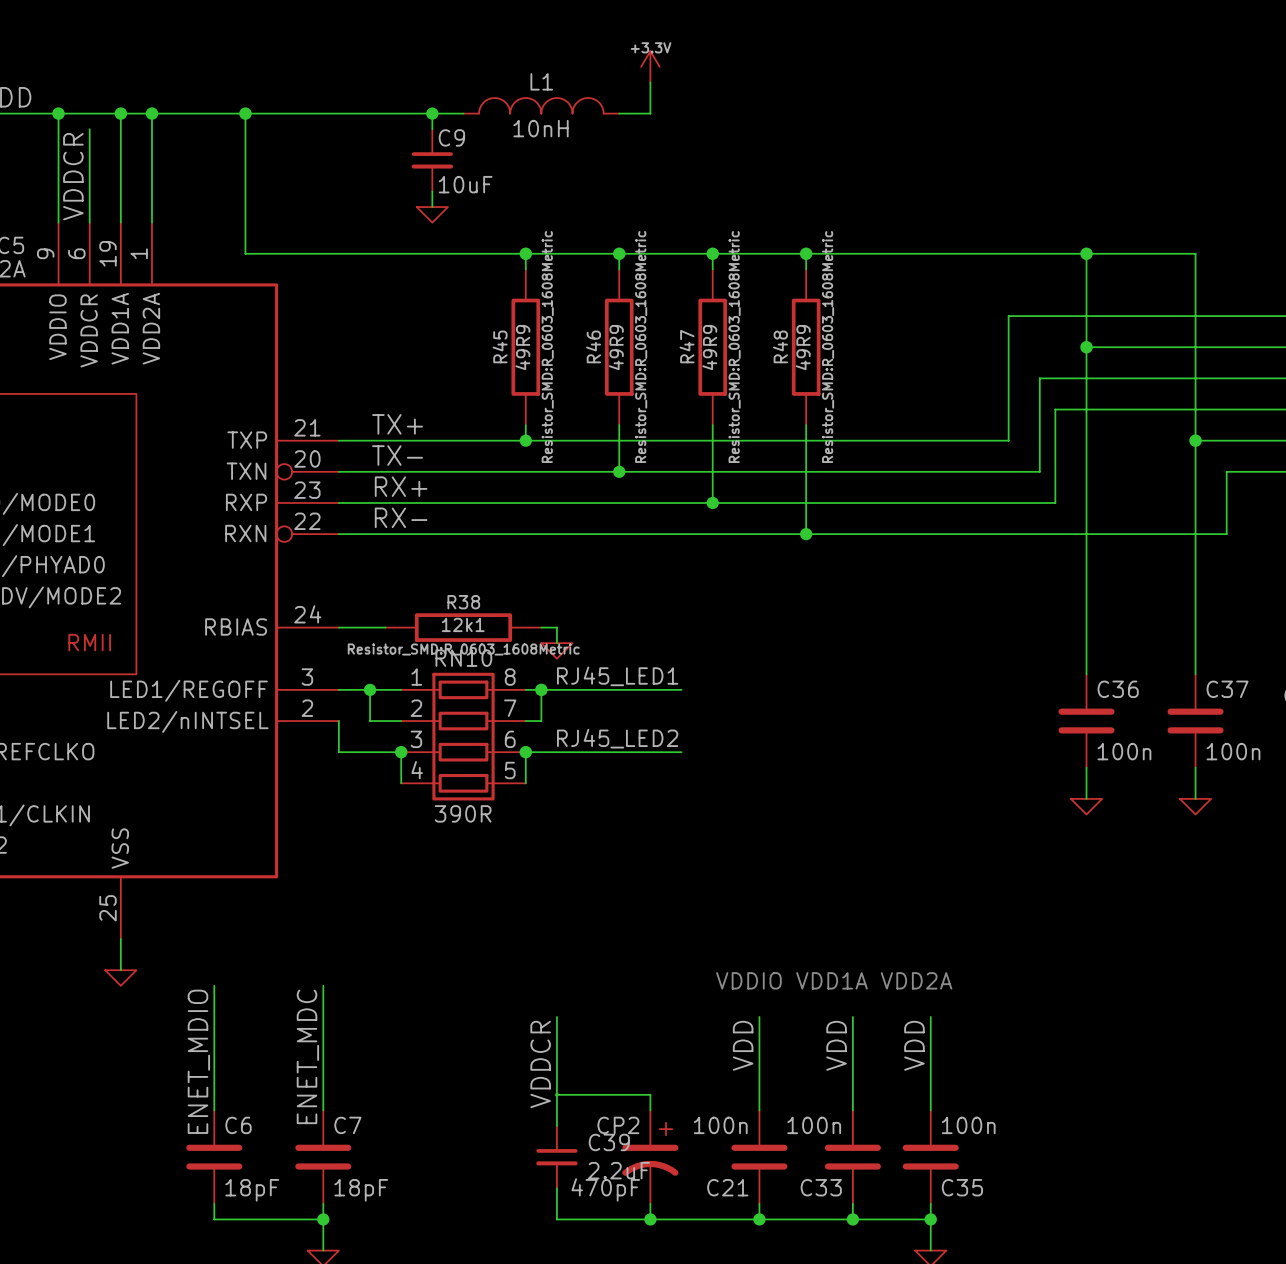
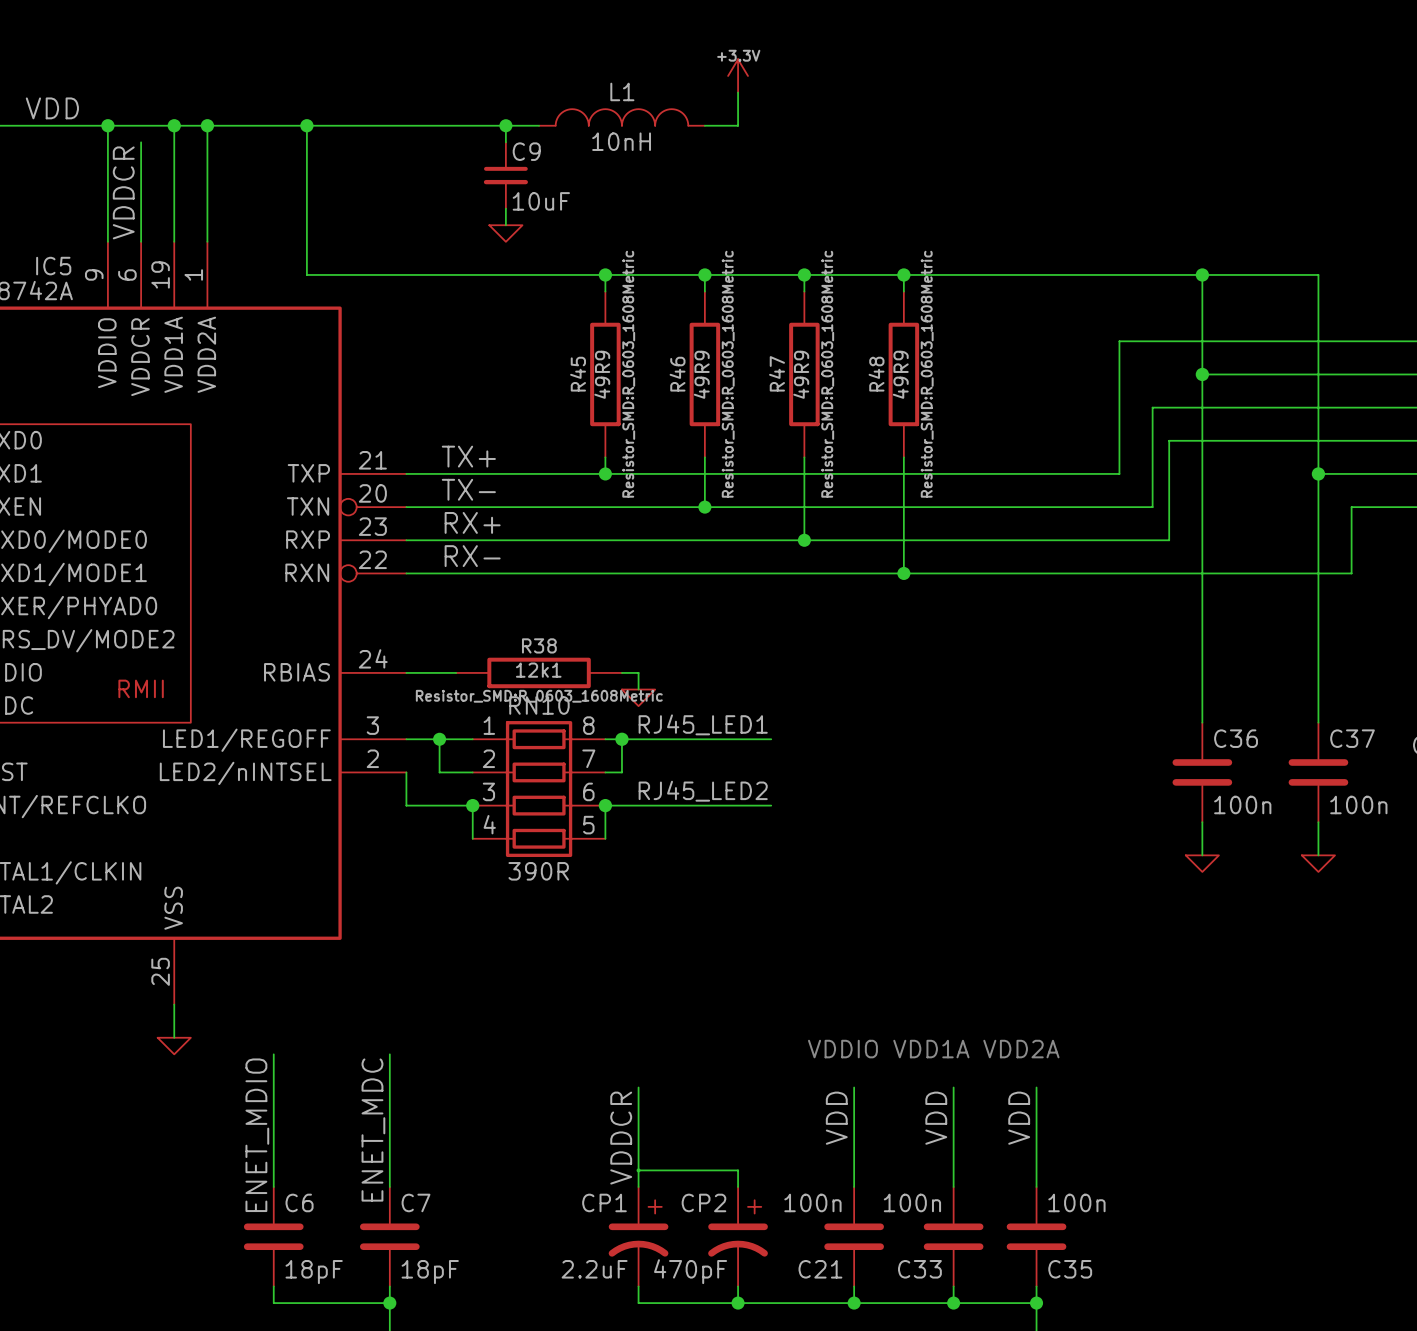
C39: 2.2uF (556, 1157) -> none
CP1: none -> 2.2uF (638, 1236)

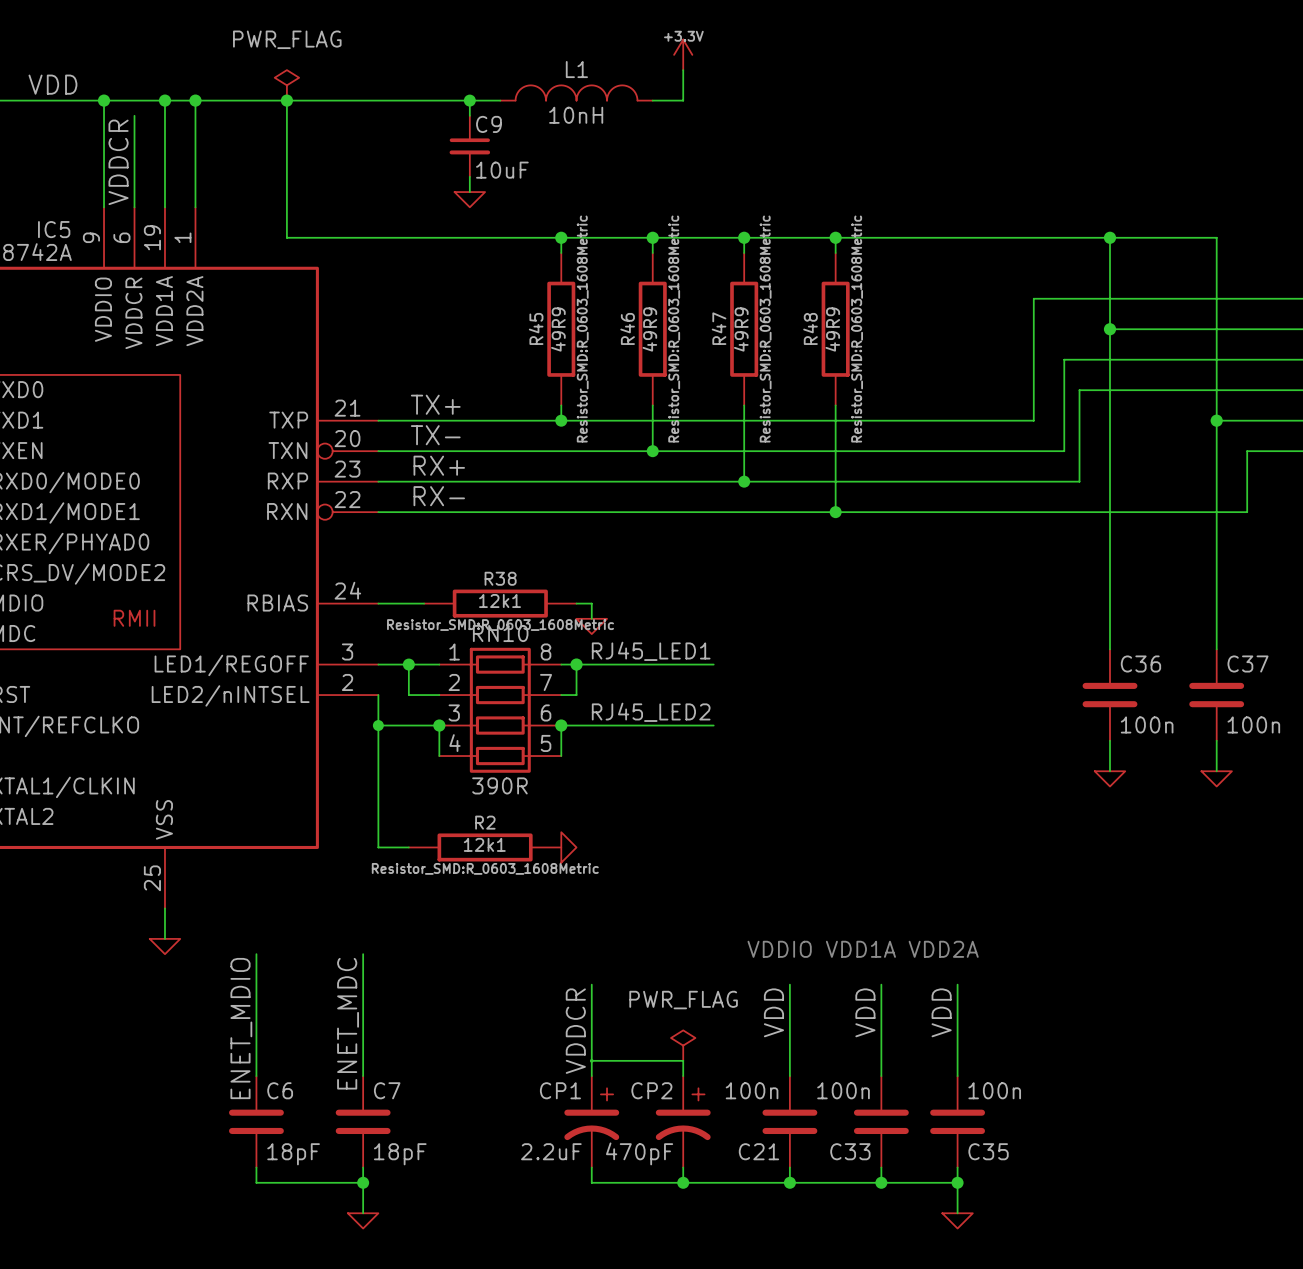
power symbol: none -> PWR_FLAG (286, 85)
wire: none -> (378, 725) (378, 847) (408, 847)
junction: none -> (378, 725)
R2: none -> 12k1 (485, 847)
power symbol: none -> (568, 847)
power symbol: none -> PWR_FLAG (683, 1045)

